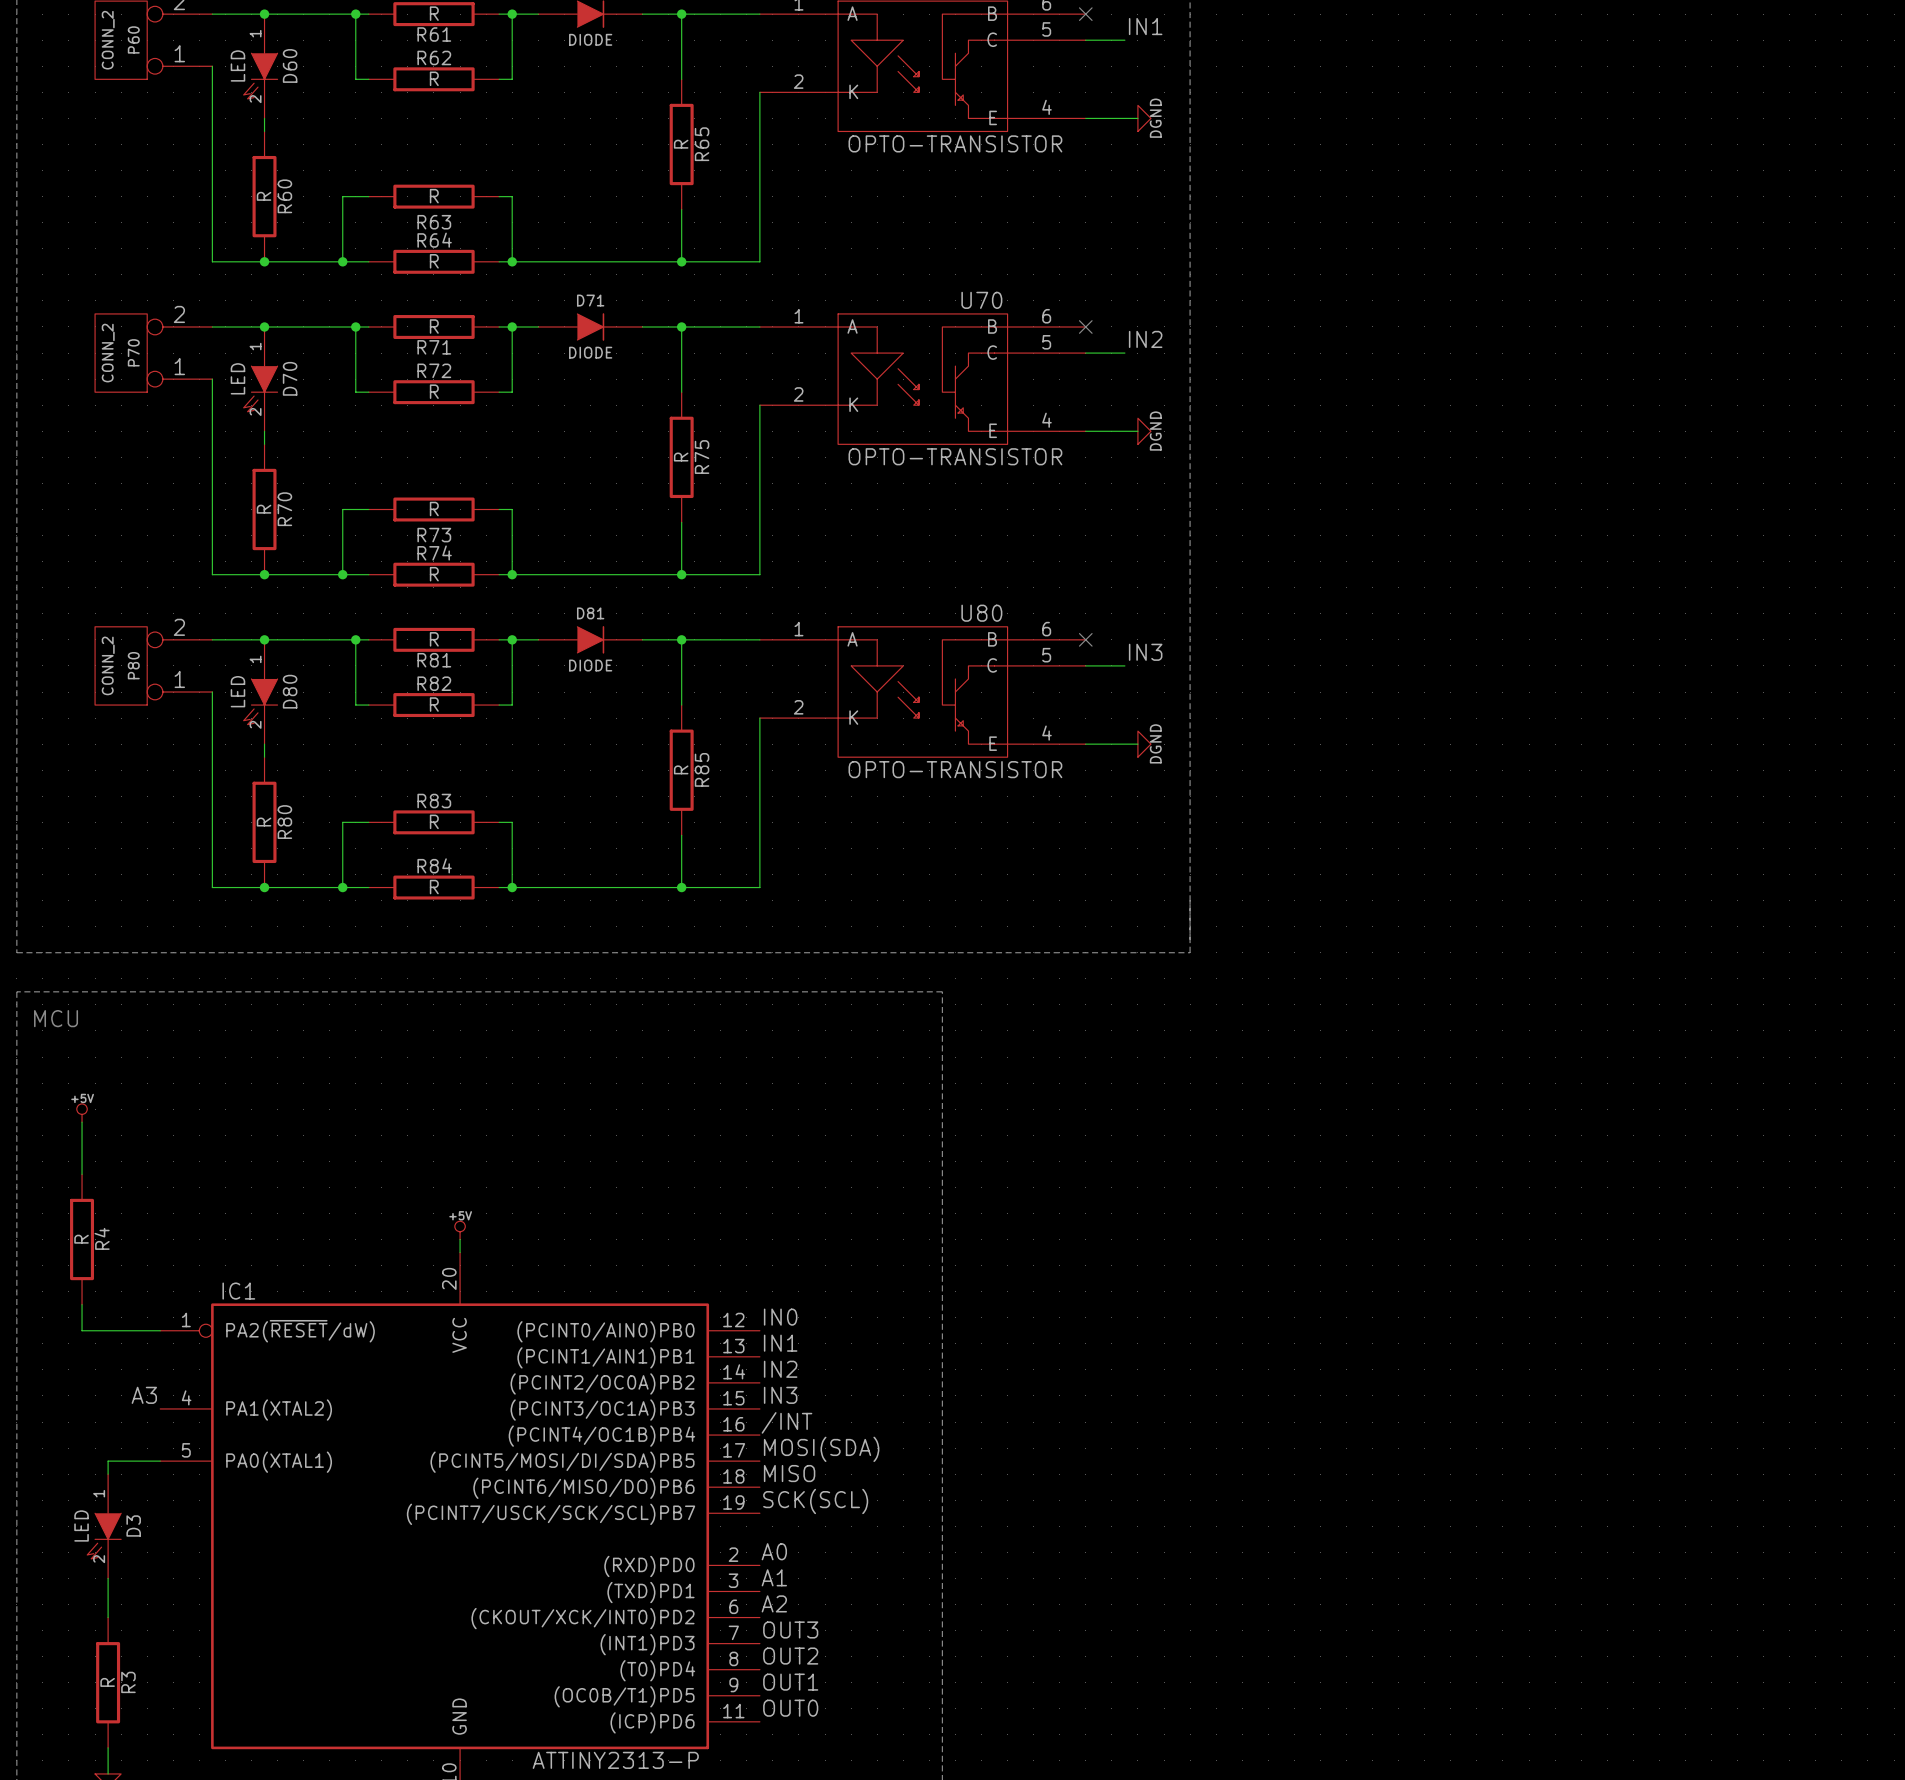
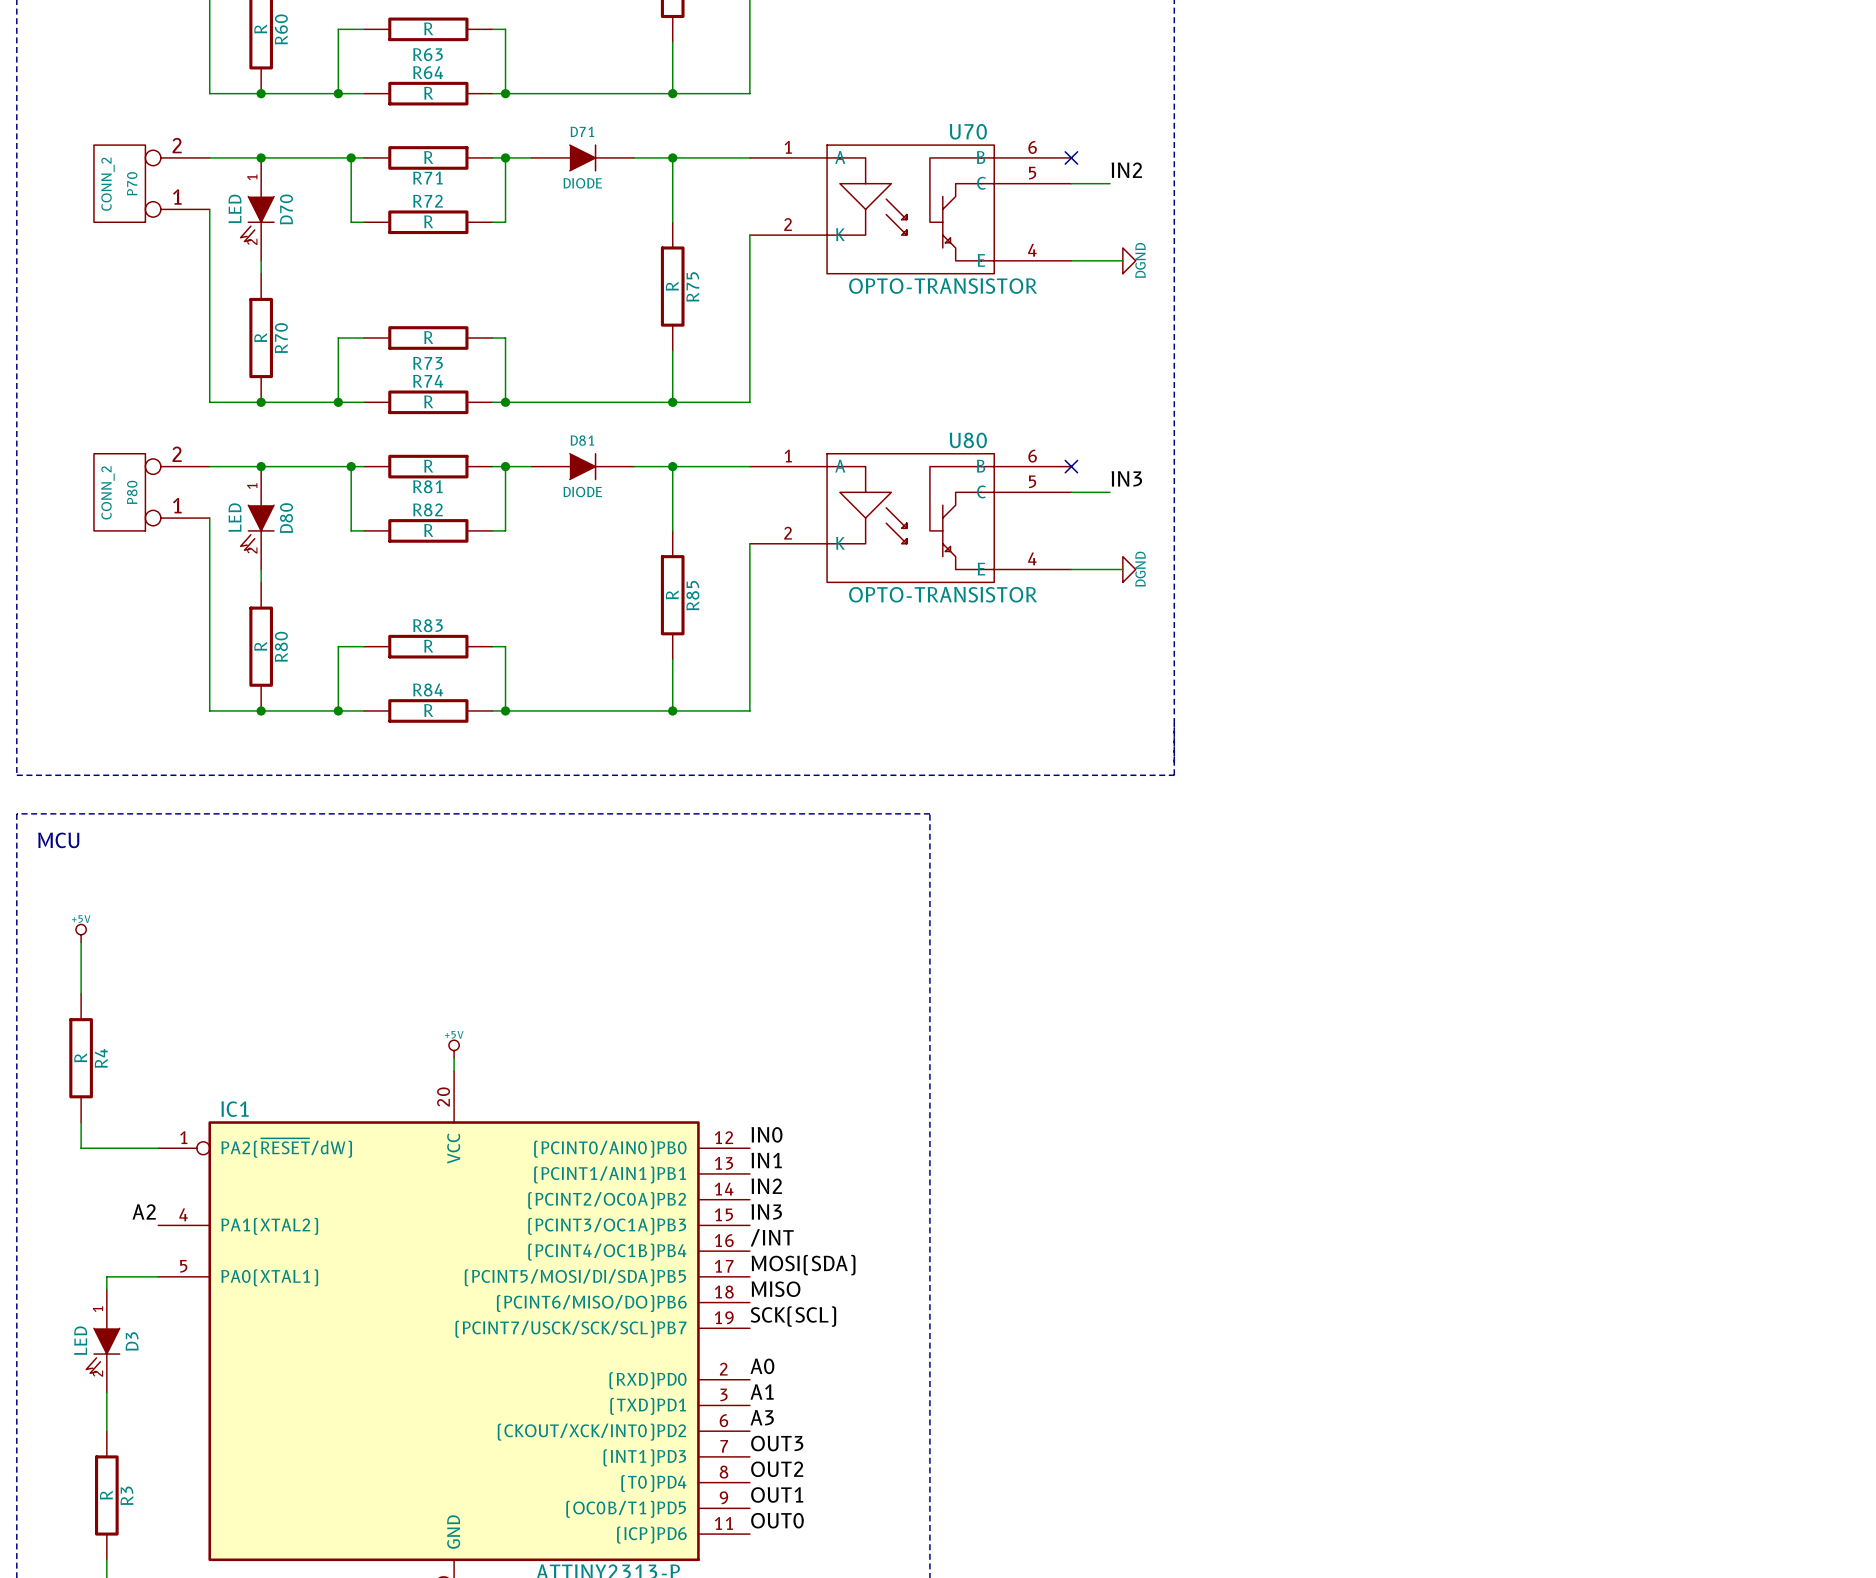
label: A3 (144, 1395) -> A2 (144, 1211)
label: A2 (774, 1603) -> A3 (762, 1417)

